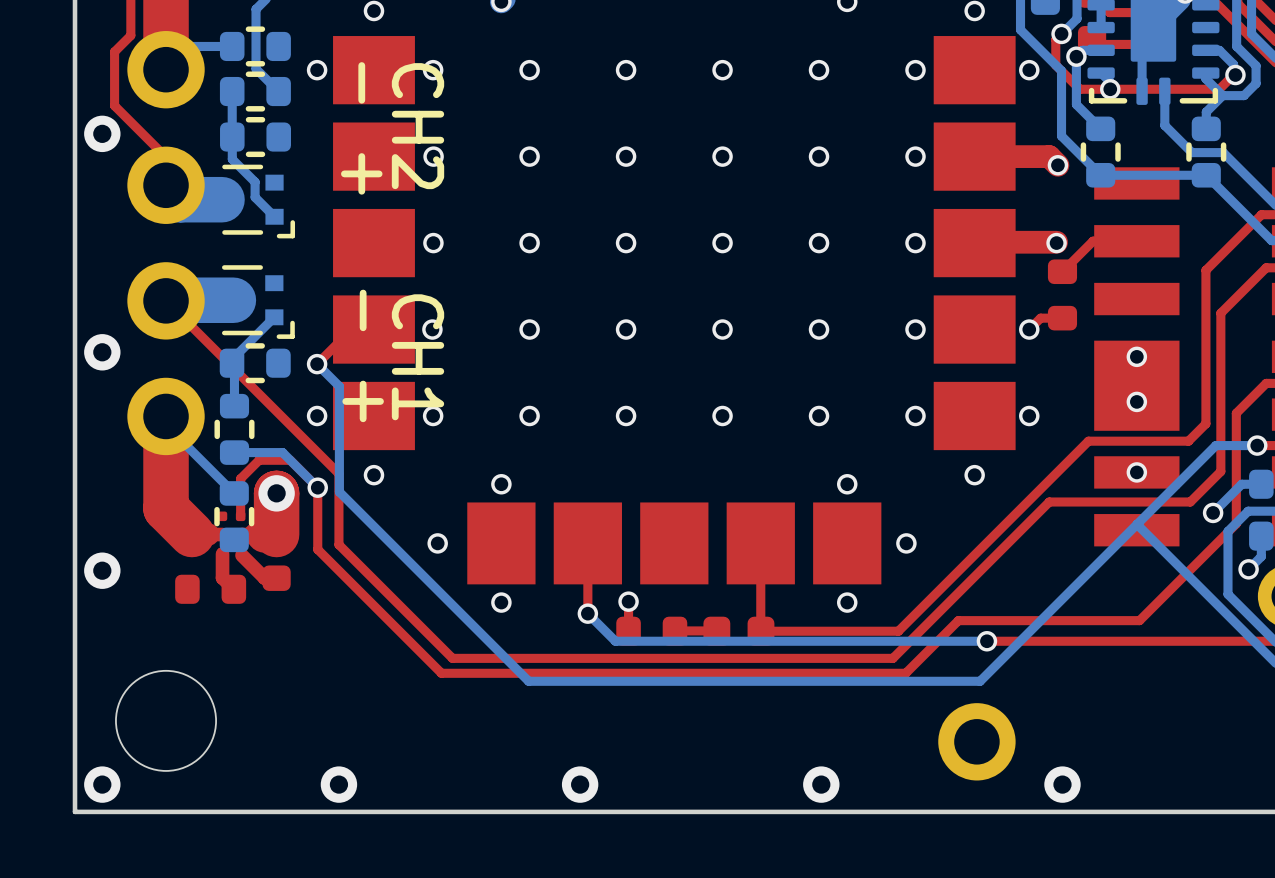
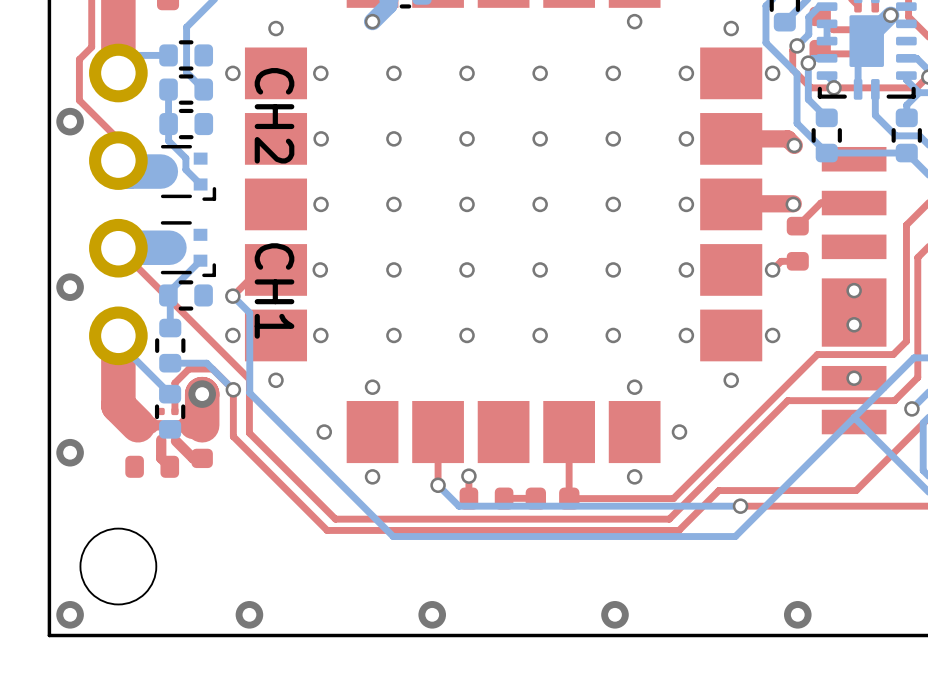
part text position: CH2 (418, 126) -> CH2 (274, 115)
part text: + - (361, 128) -> none
part text: + - (363, 355) -> none
part text position: CH1 (418, 357) -> CH1 (274, 290)
part: (976, 741) -> none

